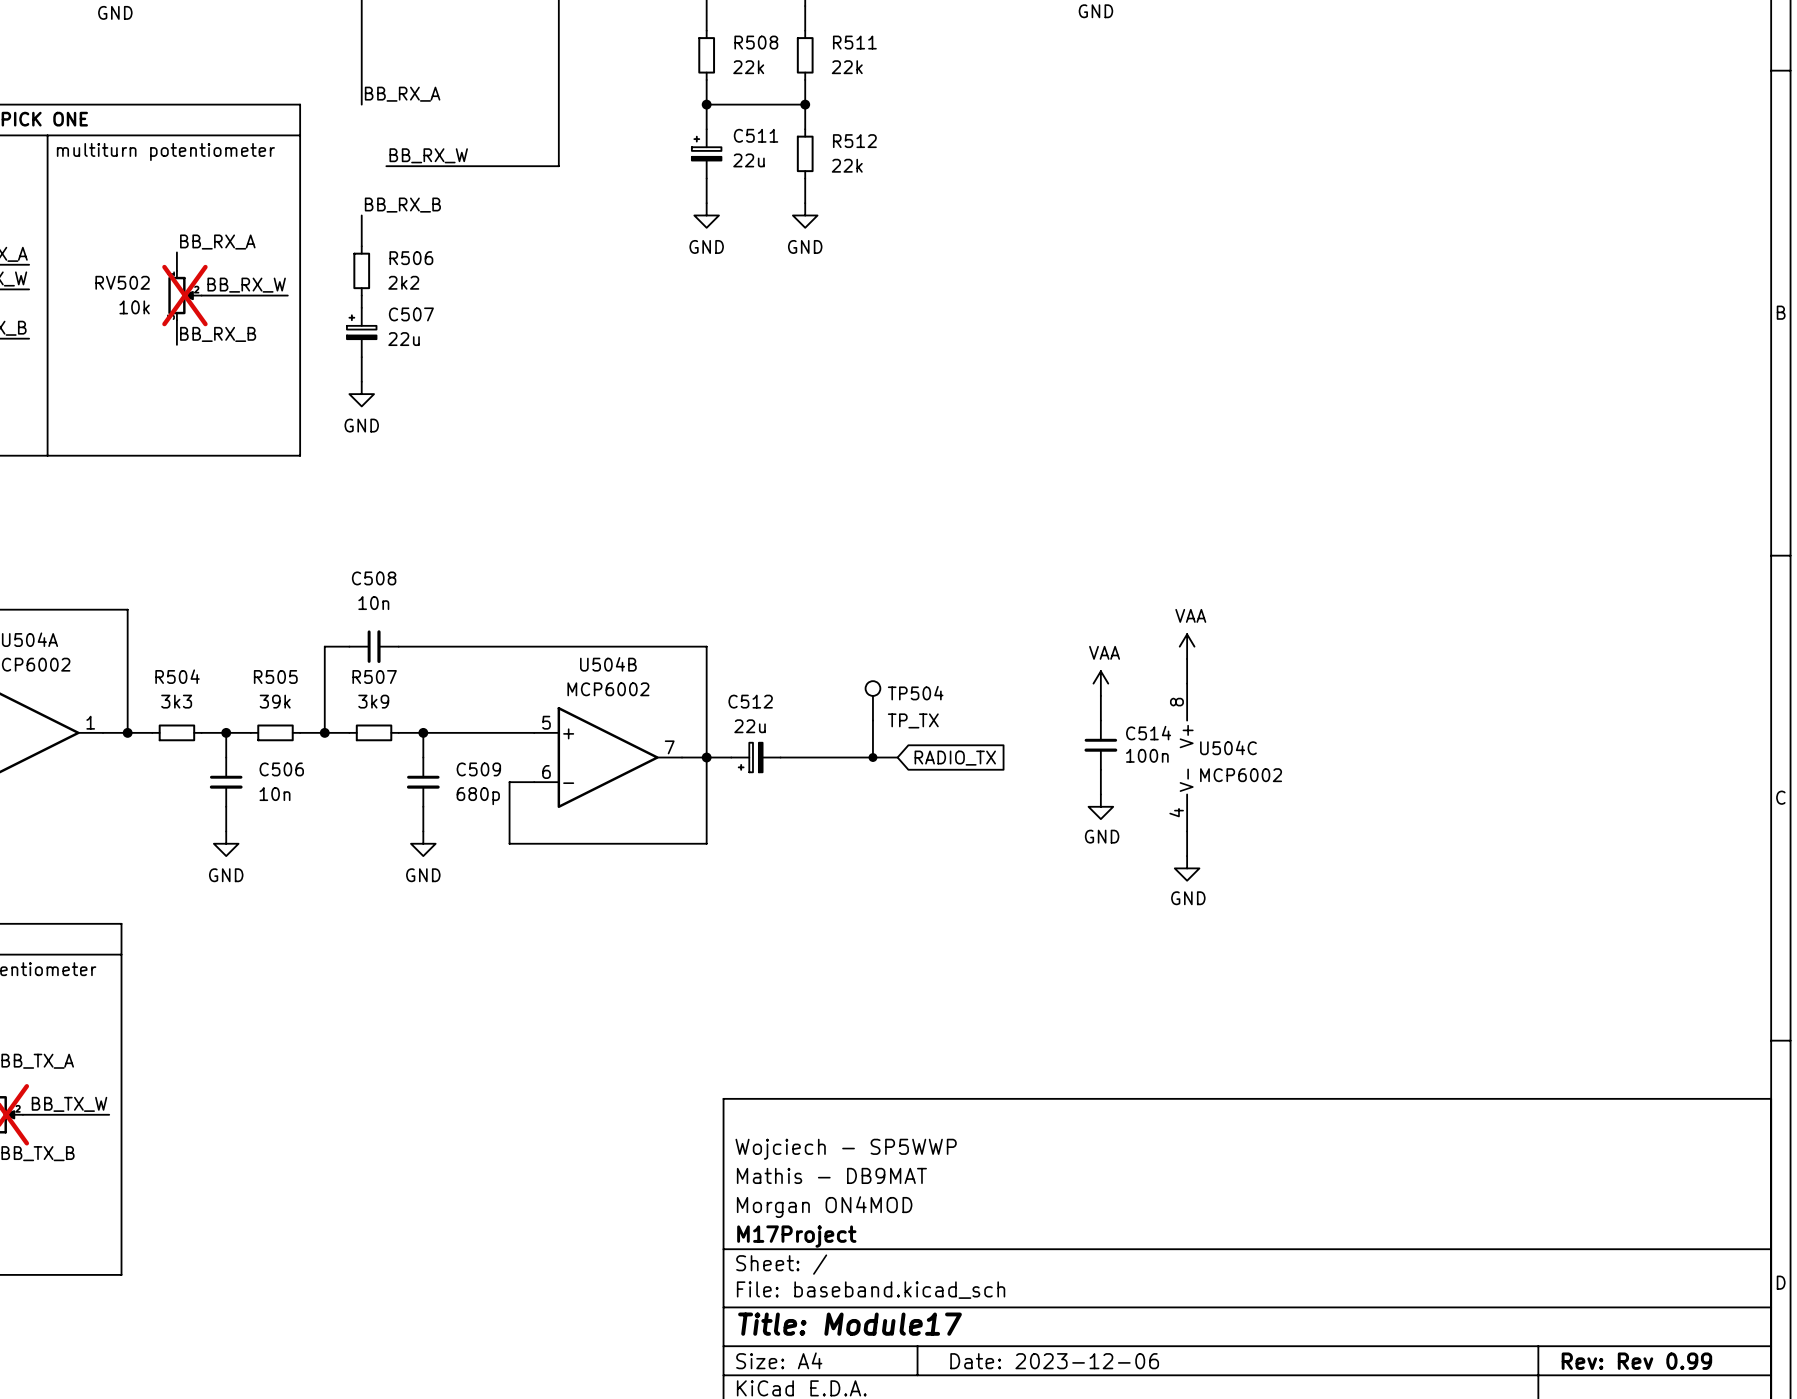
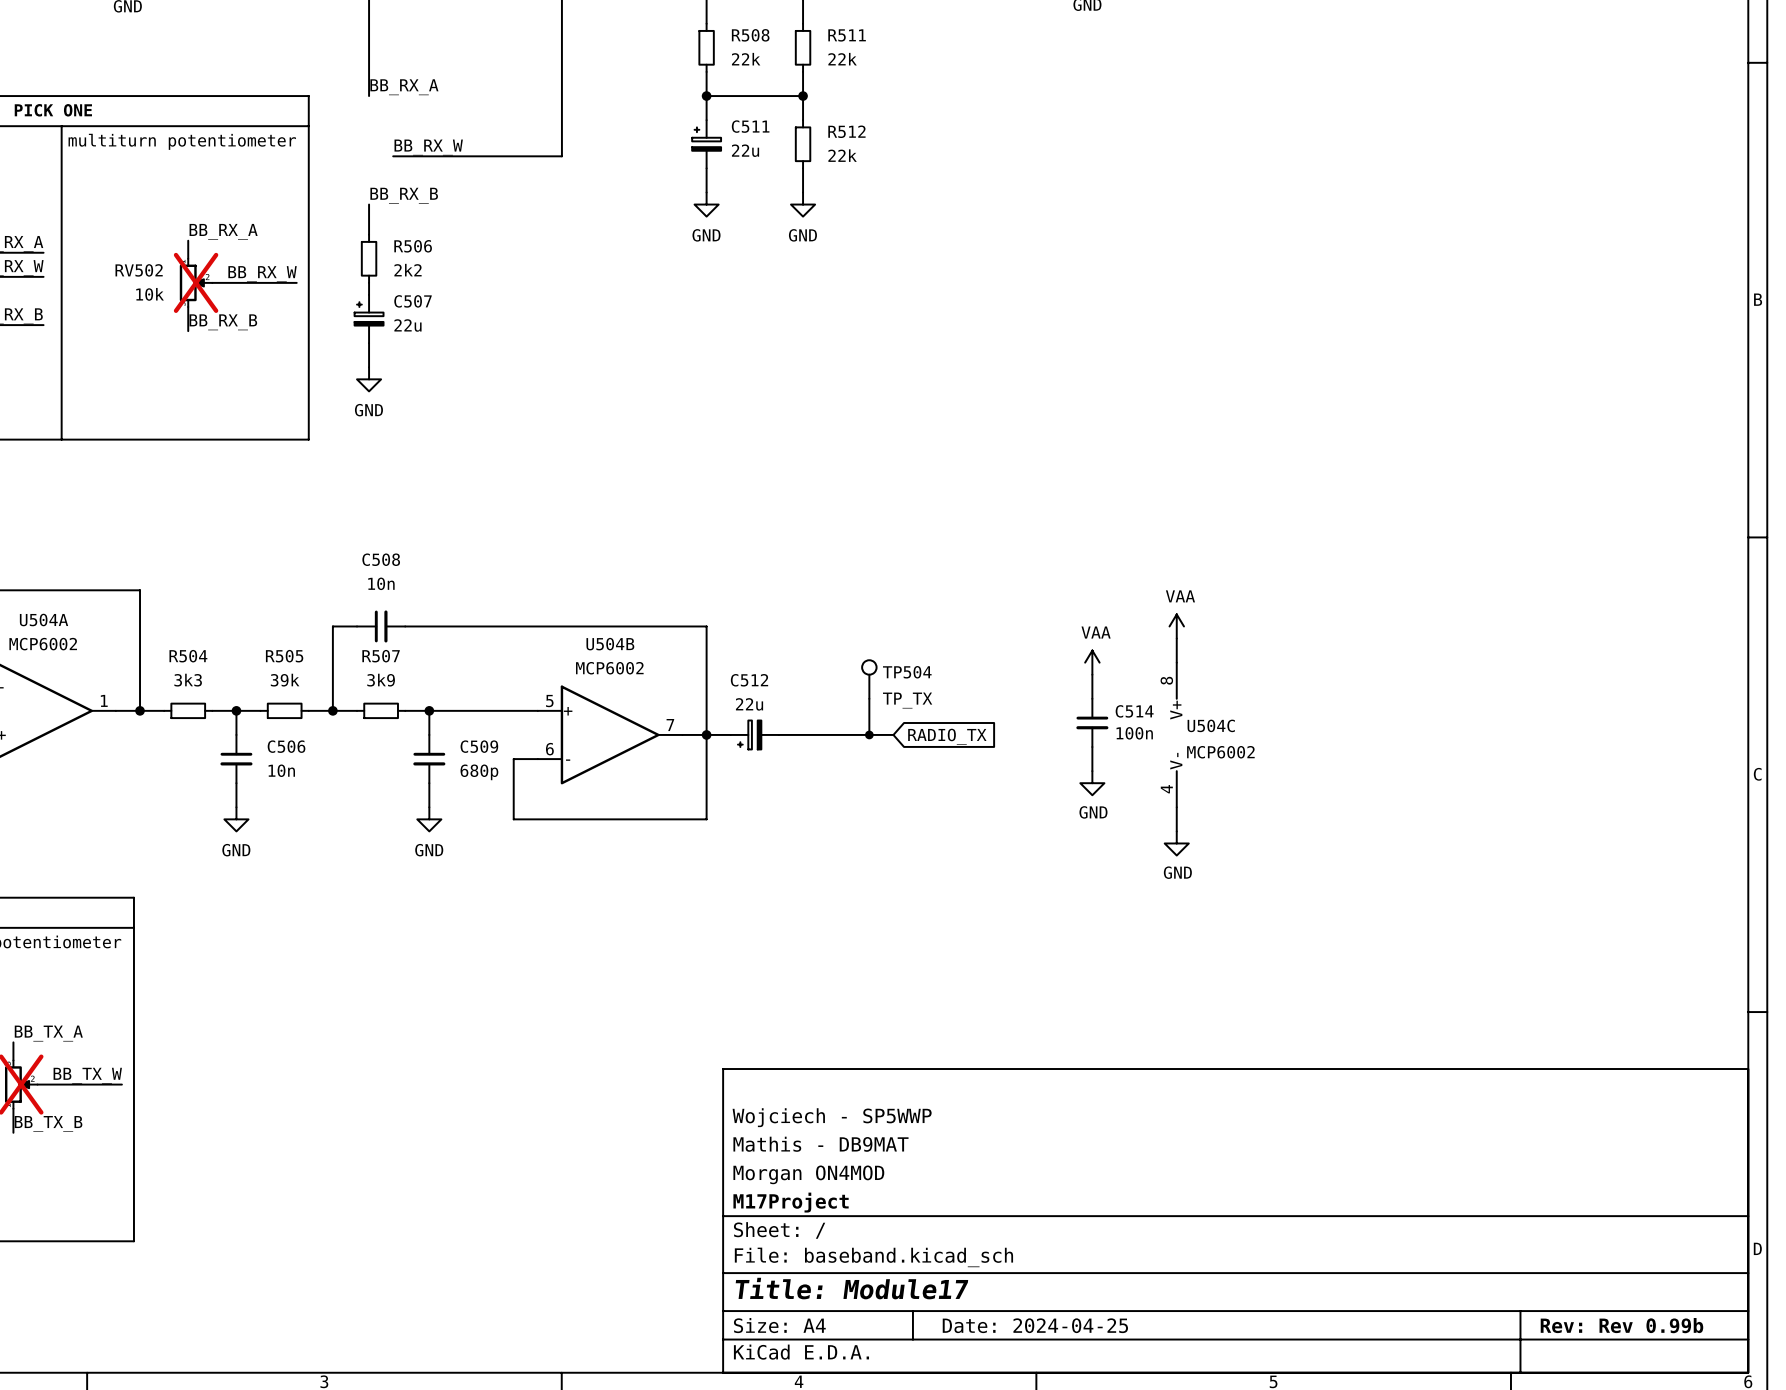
title block: Date: 2023-12-06 (1054, 1361) -> Date: 2024-04-25 (1035, 1325)
title block: Rev: Rev 0.99 (1636, 1361) -> Rev: Rev 0.99b (1621, 1325)

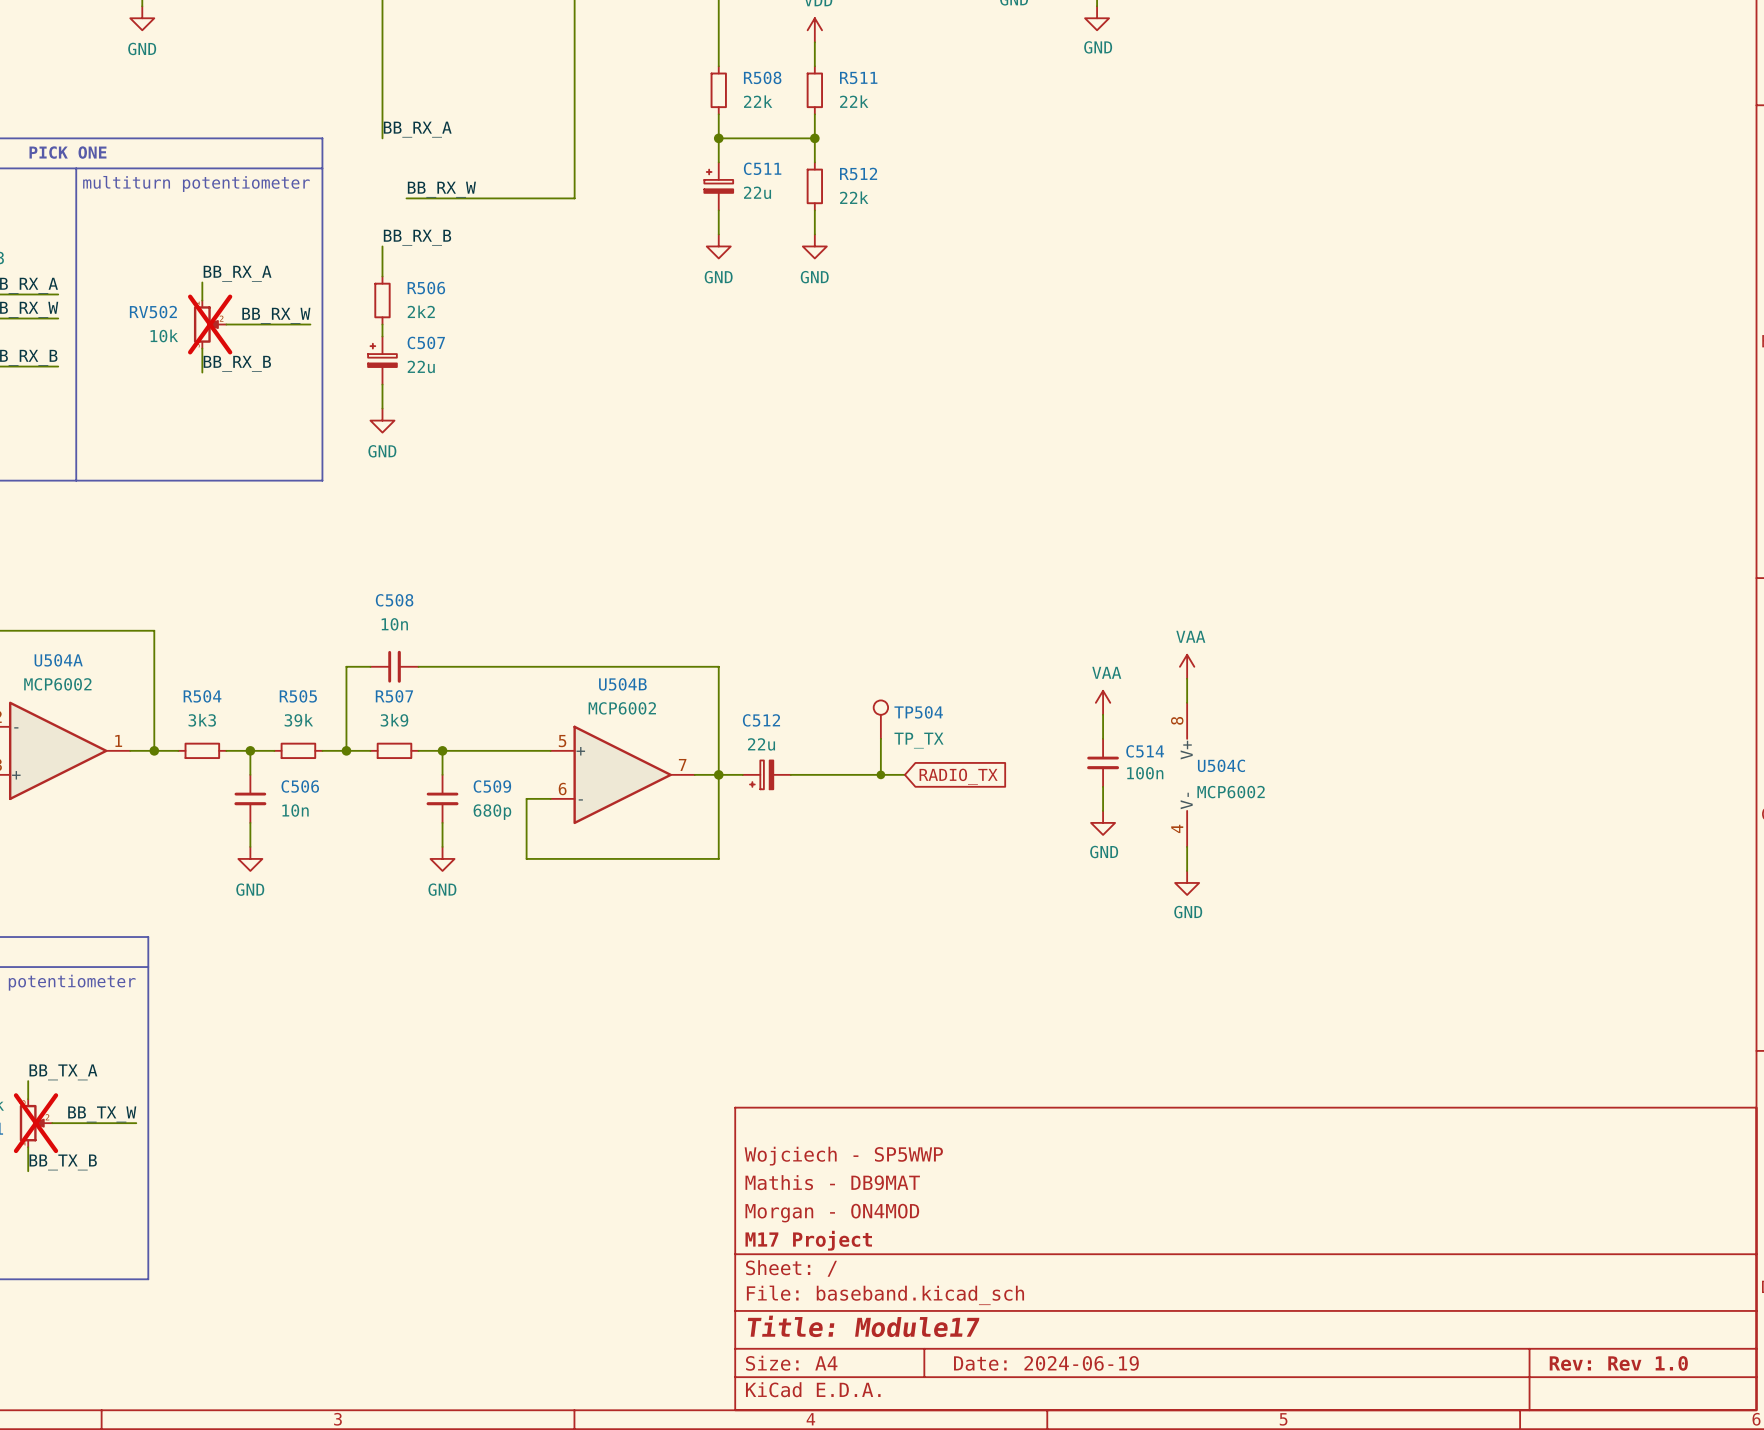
title block: Morgan ON4MOD (808, 1174) -> Morgan - ON4MOD (832, 1213)
title block: M17Project (791, 1202) -> M17 Project (808, 1240)
title block: Date: 2024-04-25 (1035, 1325) -> Date: 2024-06-19 (1046, 1363)
title block: Rev: Rev 0.99b (1621, 1325) -> Rev: Rev 1.0 (1618, 1363)

